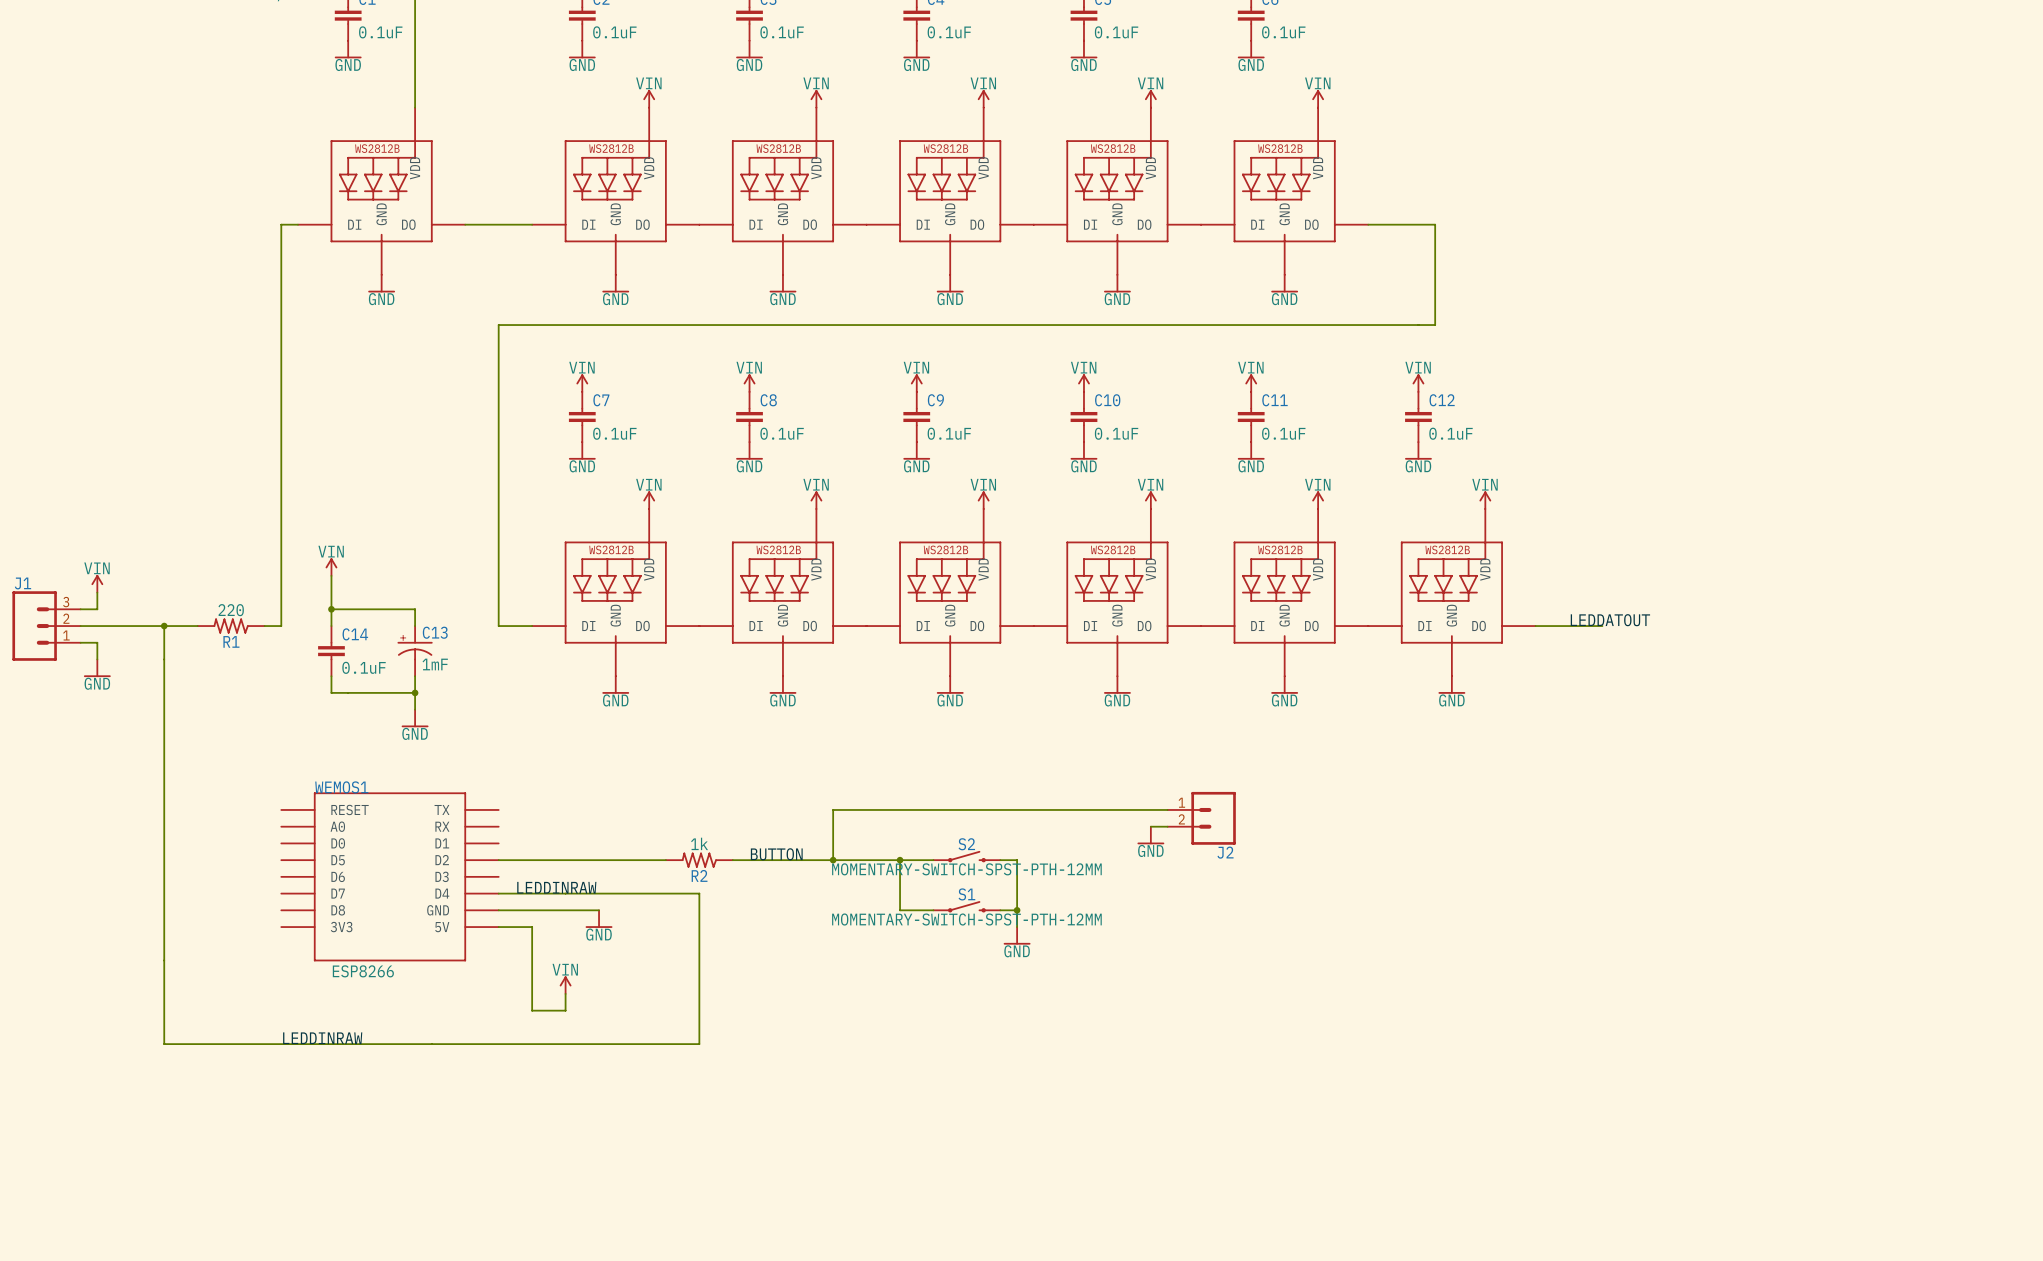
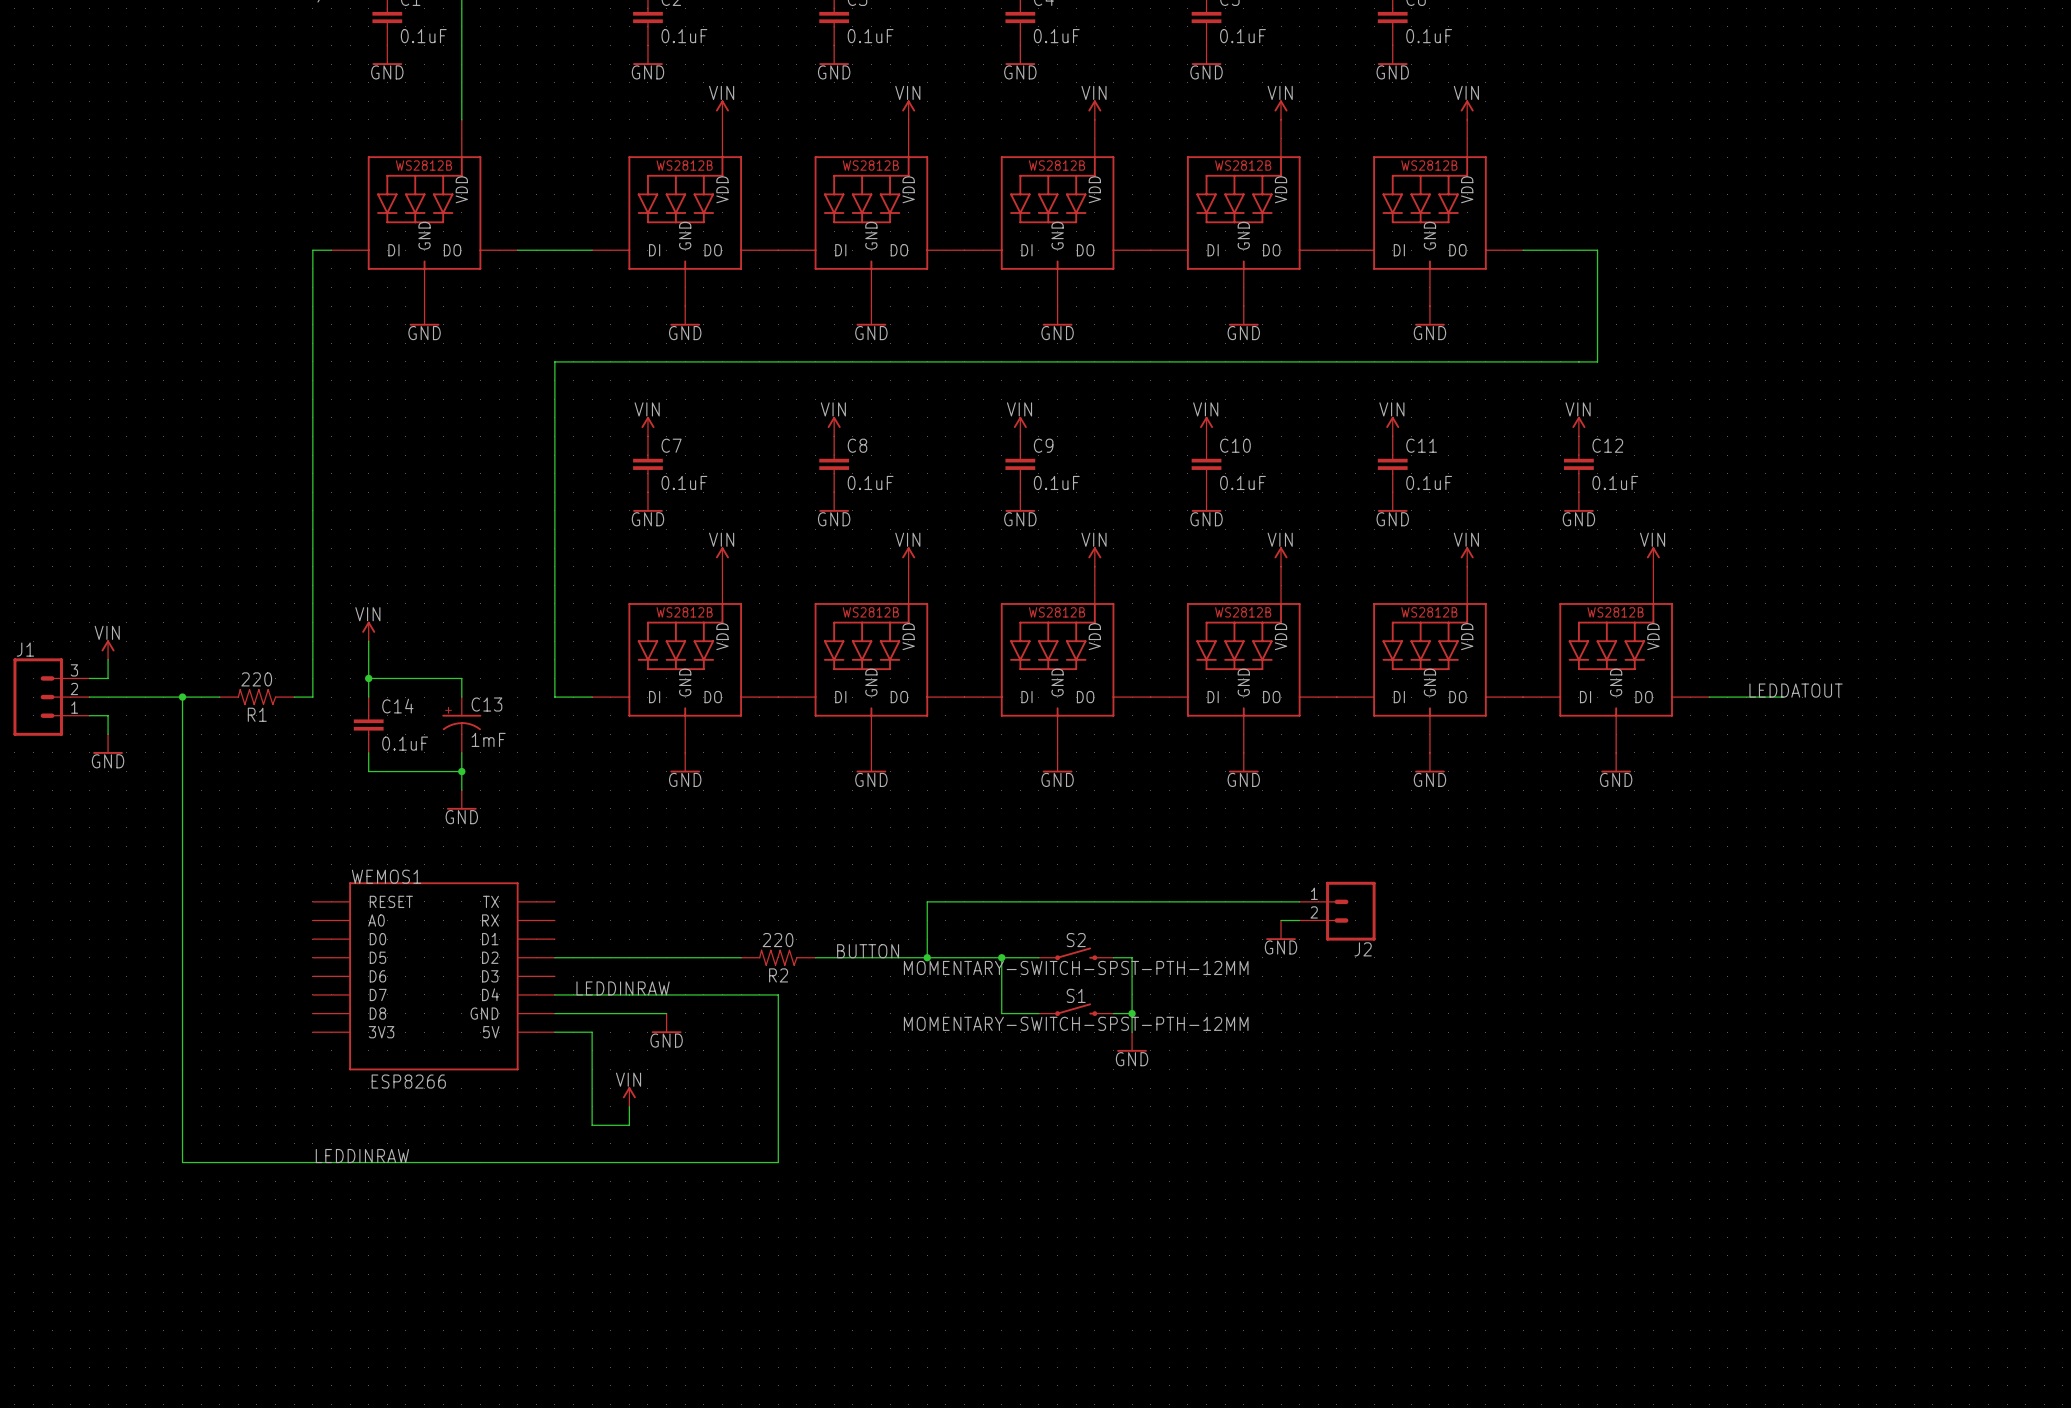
R2 value: 1k (699, 843) -> 220 (778, 940)

